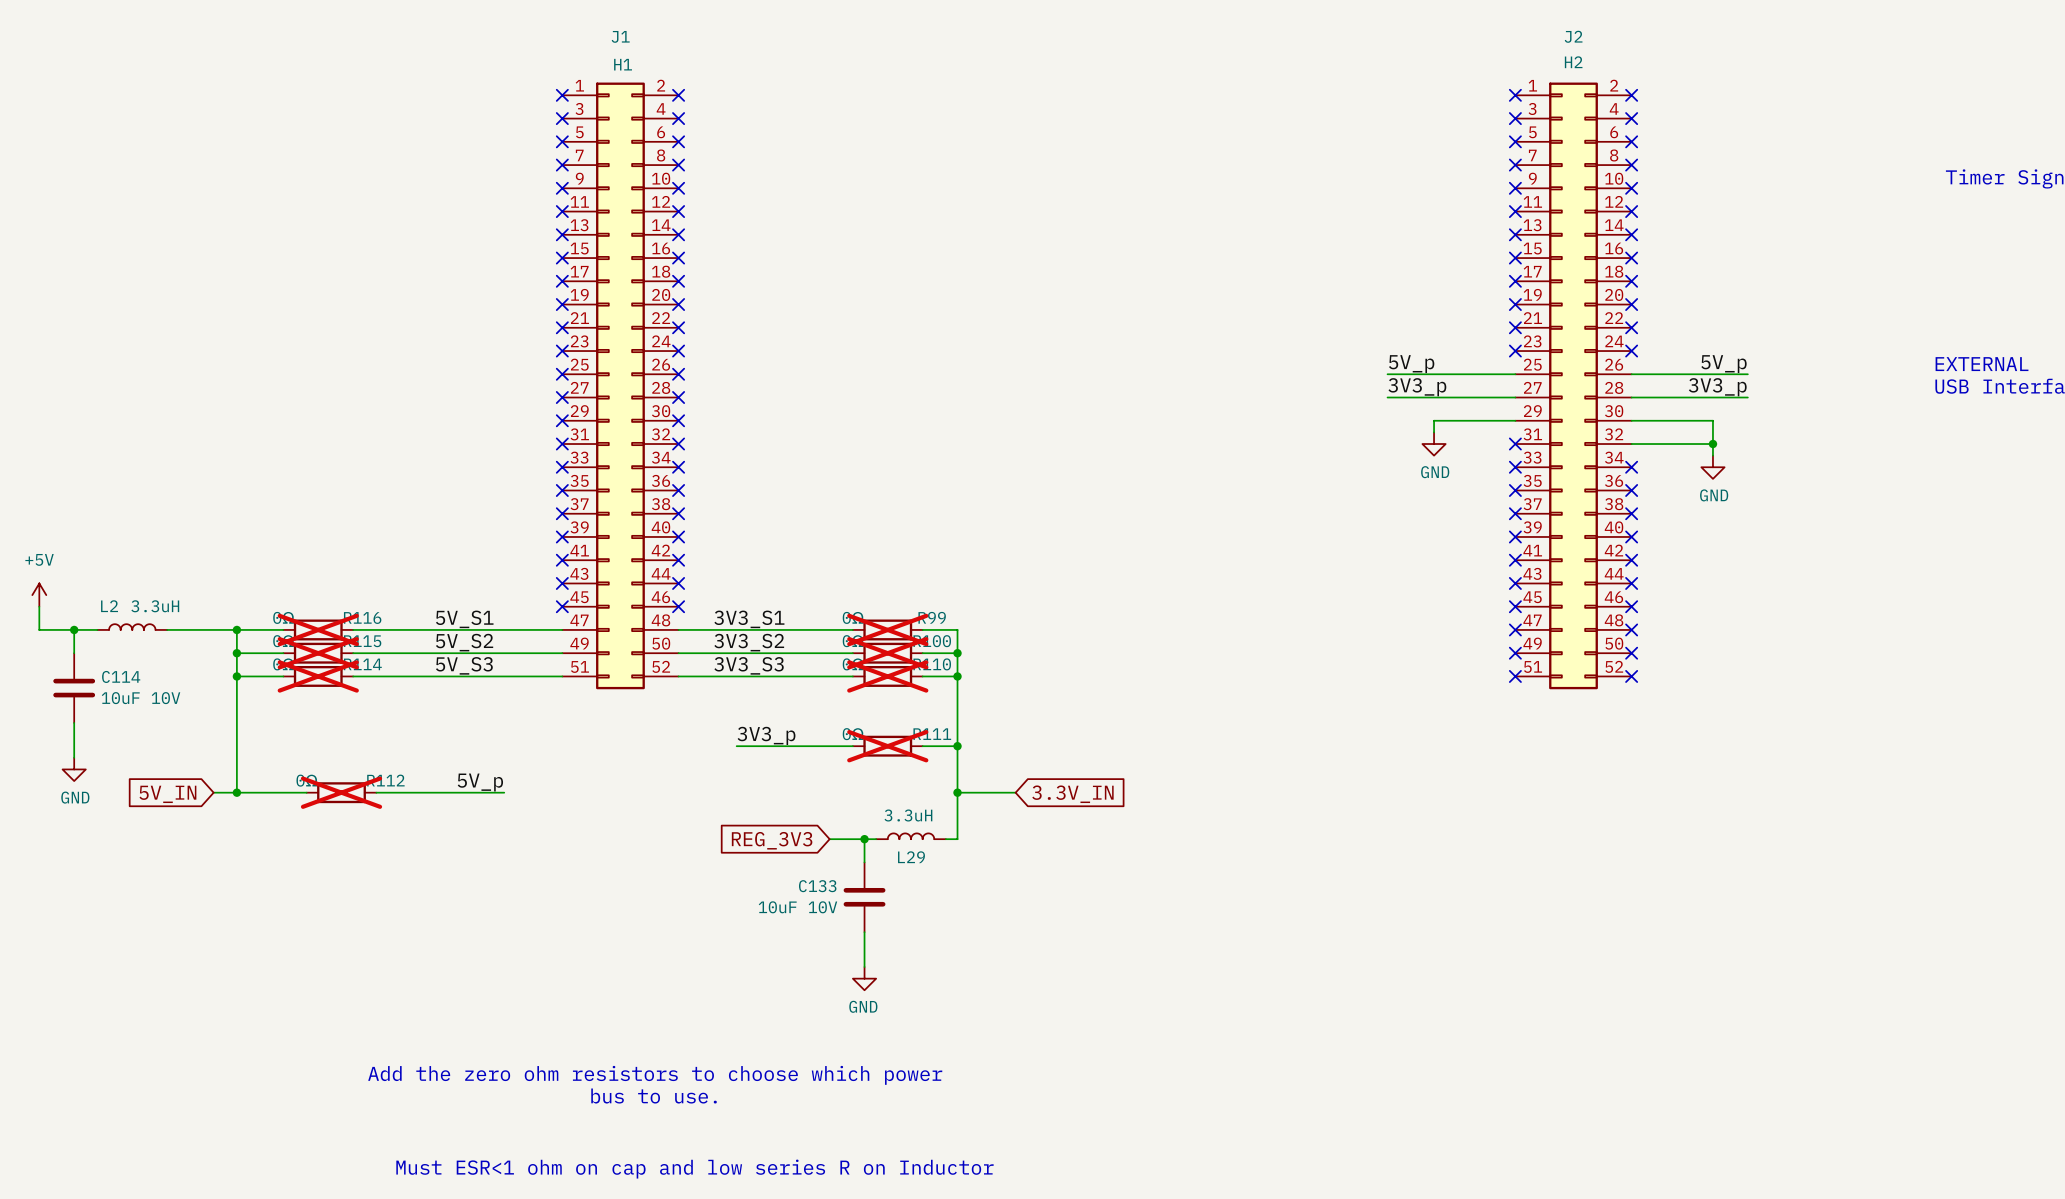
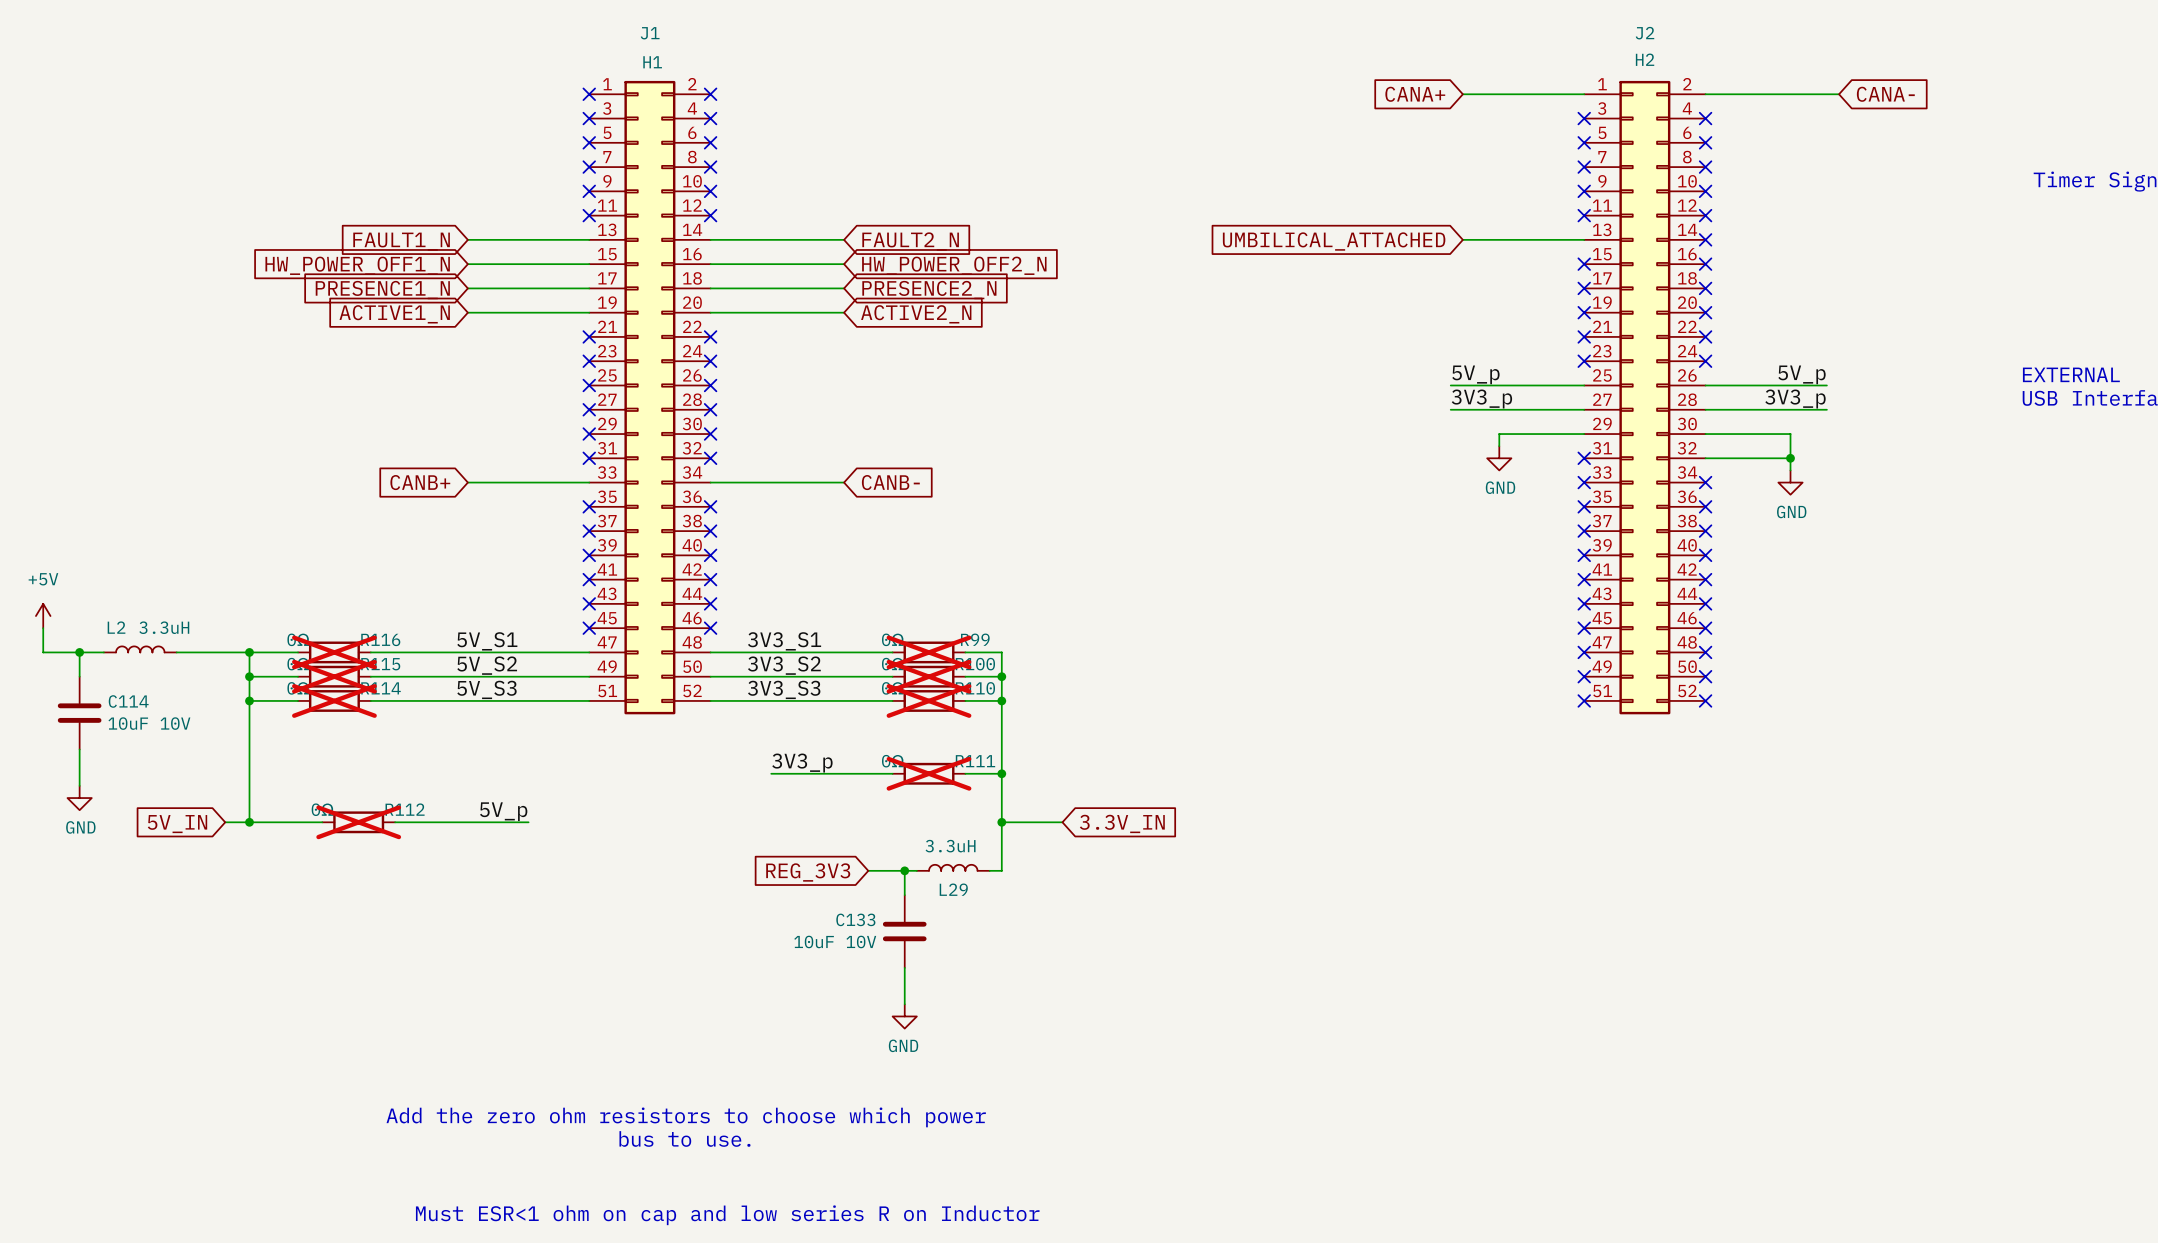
global label: none -> CANA+ (1415, 94)
wire: none -> (1462, 94) (1584, 94)
no-connect mark: (1515, 95) -> none
wire: none -> (1705, 94) (1839, 94)
no-connect mark: (1631, 95) -> none
global label: none -> CANA- (1885, 94)
wire: none -> (467, 239) (589, 239)
no-connect mark: (562, 234) -> none
wire: none -> (710, 239) (844, 239)
no-connect mark: (678, 234) -> none
wire: none -> (1462, 239) (1584, 239)
no-connect mark: (1515, 234) -> none
global label: none -> FAULT1_N (401, 241)
global label: none -> FAULT2_N (910, 241)
global label: none -> UMBILICAL_ATTACHED (1334, 241)
wire: none -> (467, 264) (589, 264)
no-connect mark: (562, 258) -> none
wire: none -> (710, 264) (844, 264)
no-connect mark: (678, 258) -> none
global label: none -> HW_POWER_OFF1_N (357, 265)
global label: none -> HW_POWER_OFF2_N (954, 265)
wire: none -> (467, 288) (589, 288)
no-connect mark: (562, 281) -> none
wire: none -> (710, 288) (844, 288)
no-connect mark: (678, 281) -> none
global label: none -> PRESENCE1_N (382, 290)
global label: none -> PRESENCE2_N (929, 290)
wire: none -> (467, 312) (589, 312)
no-connect mark: (562, 304) -> none
wire: none -> (710, 312) (844, 312)
no-connect mark: (678, 304) -> none
global label: none -> ACTIVE1_N (394, 314)
global label: none -> ACTIVE2_N (916, 314)
global label: none -> CANB+ (420, 482)
wire: none -> (467, 482) (589, 482)
no-connect mark: (562, 467) -> none
wire: none -> (710, 482) (844, 482)
no-connect mark: (678, 467) -> none
global label: none -> CANB- (890, 482)

